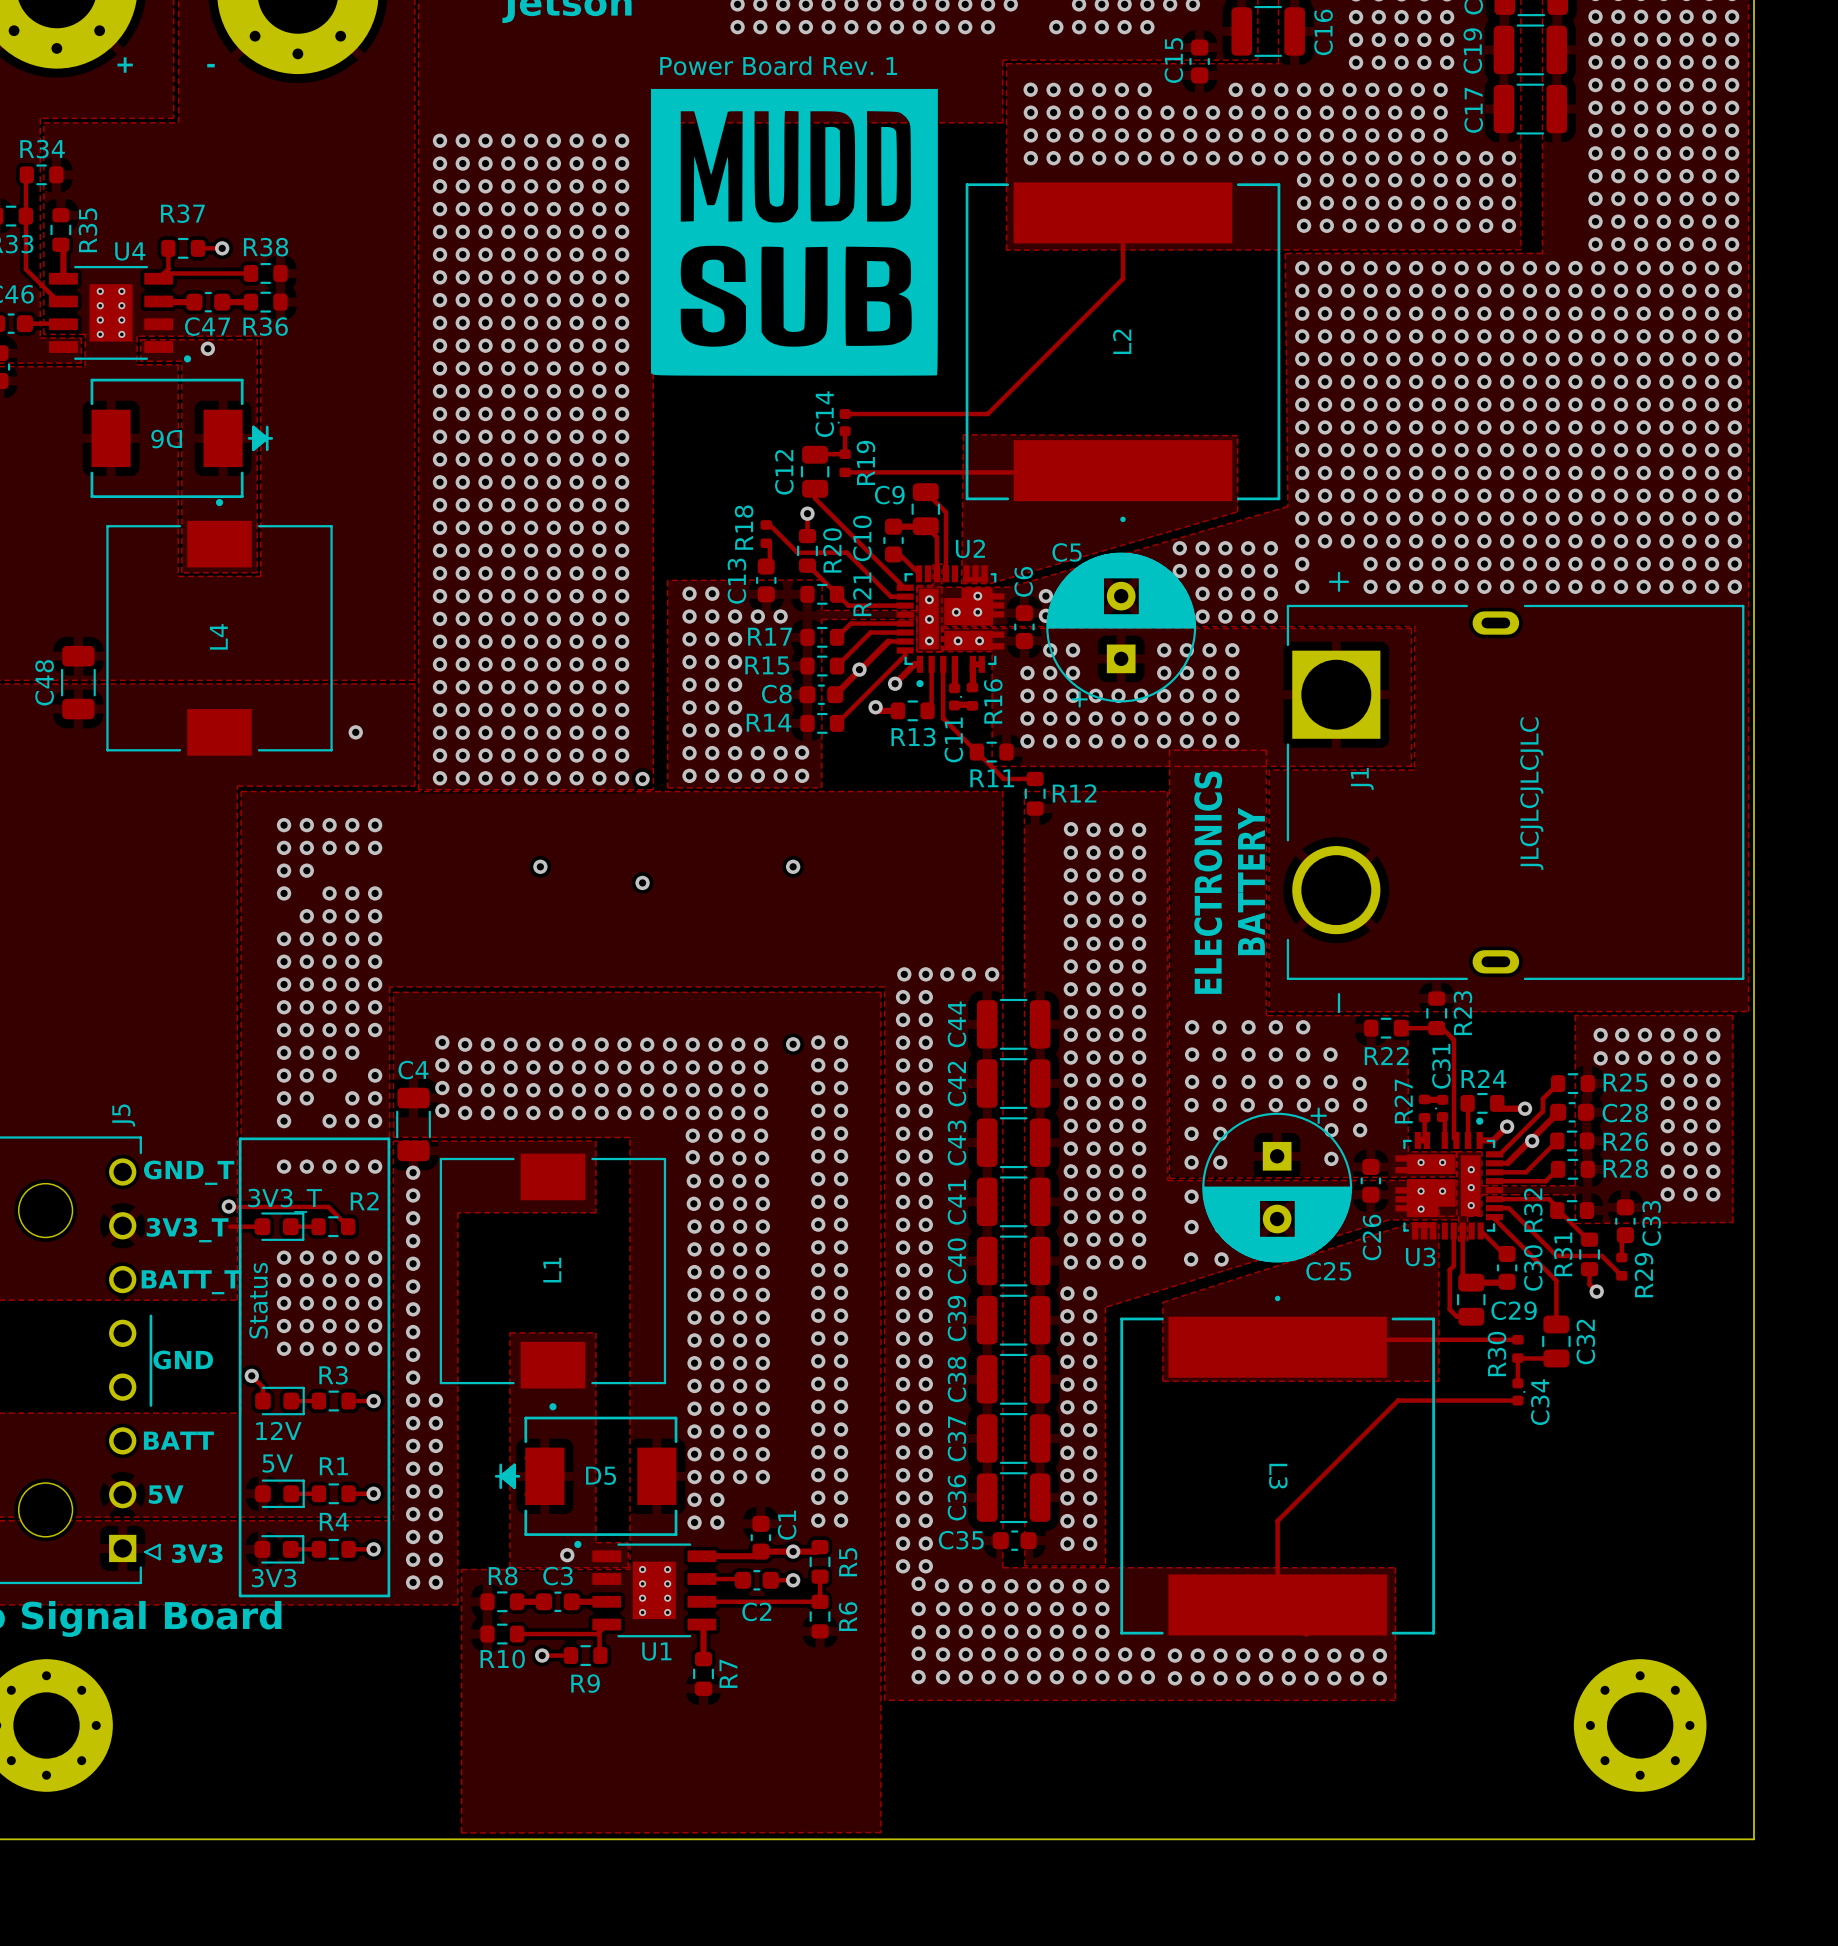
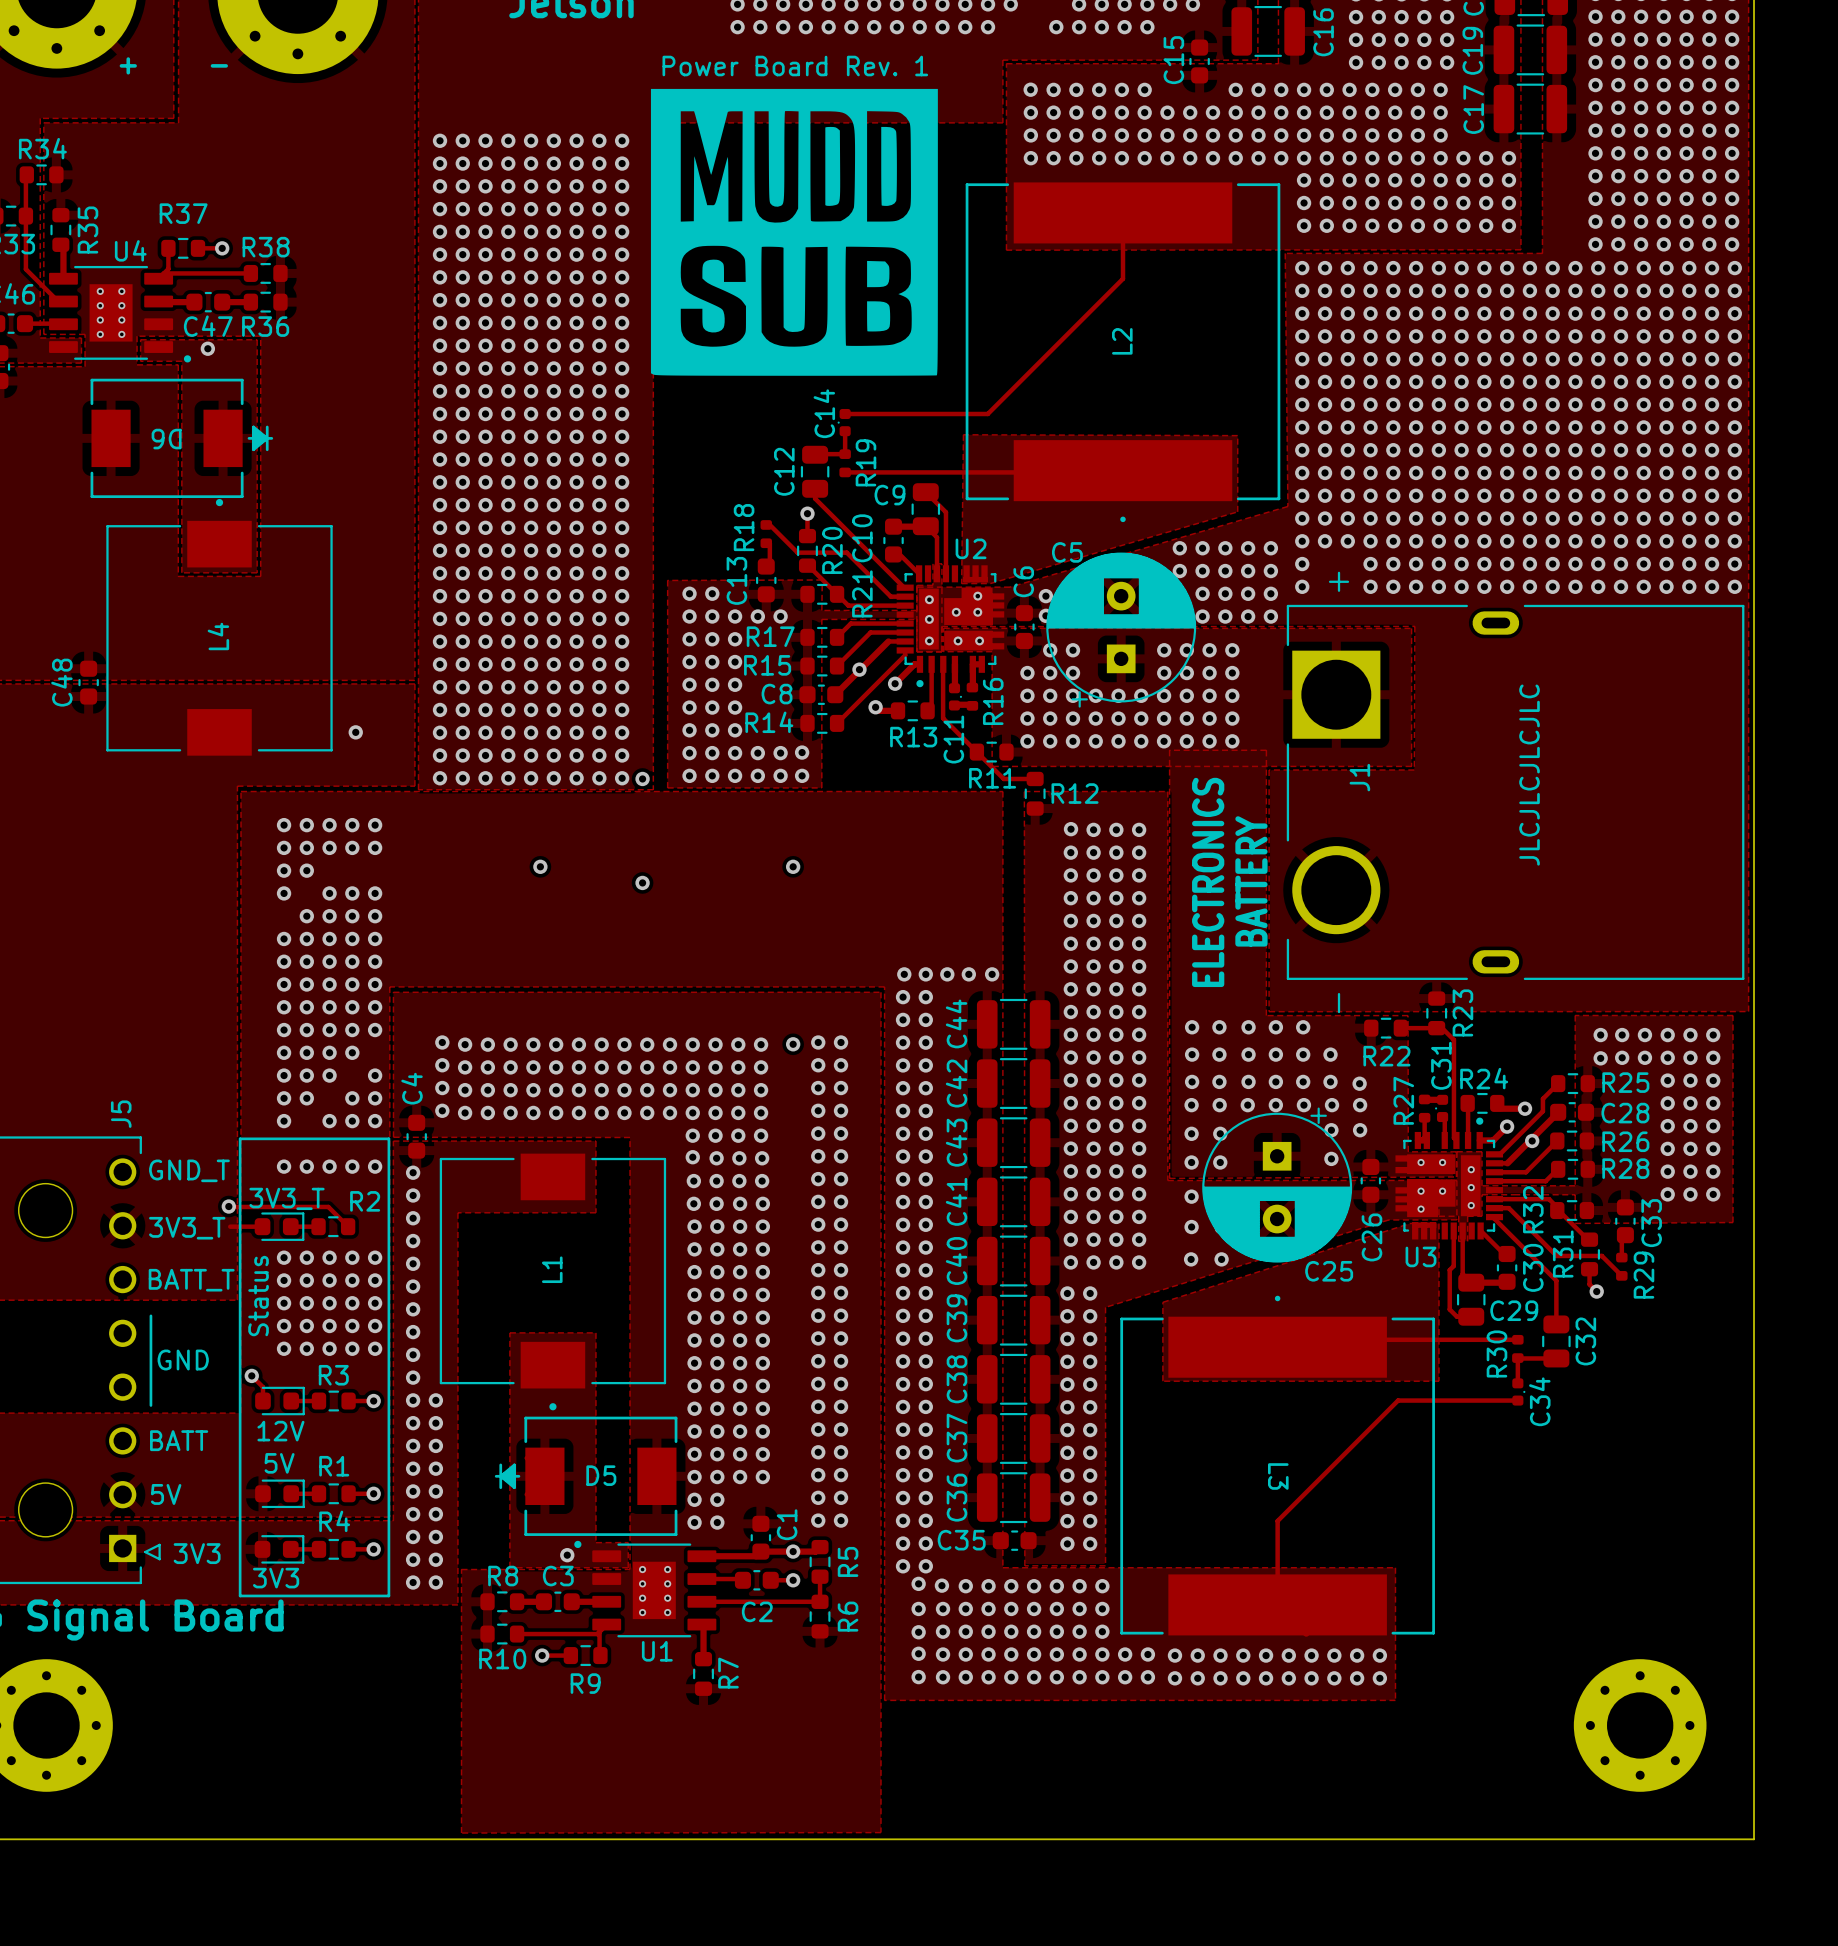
C48 footprint: [61, 645, 96, 720] -> [78, 660, 99, 705]
C4 footprint: [396, 1087, 431, 1162] -> [406, 1114, 427, 1159]

